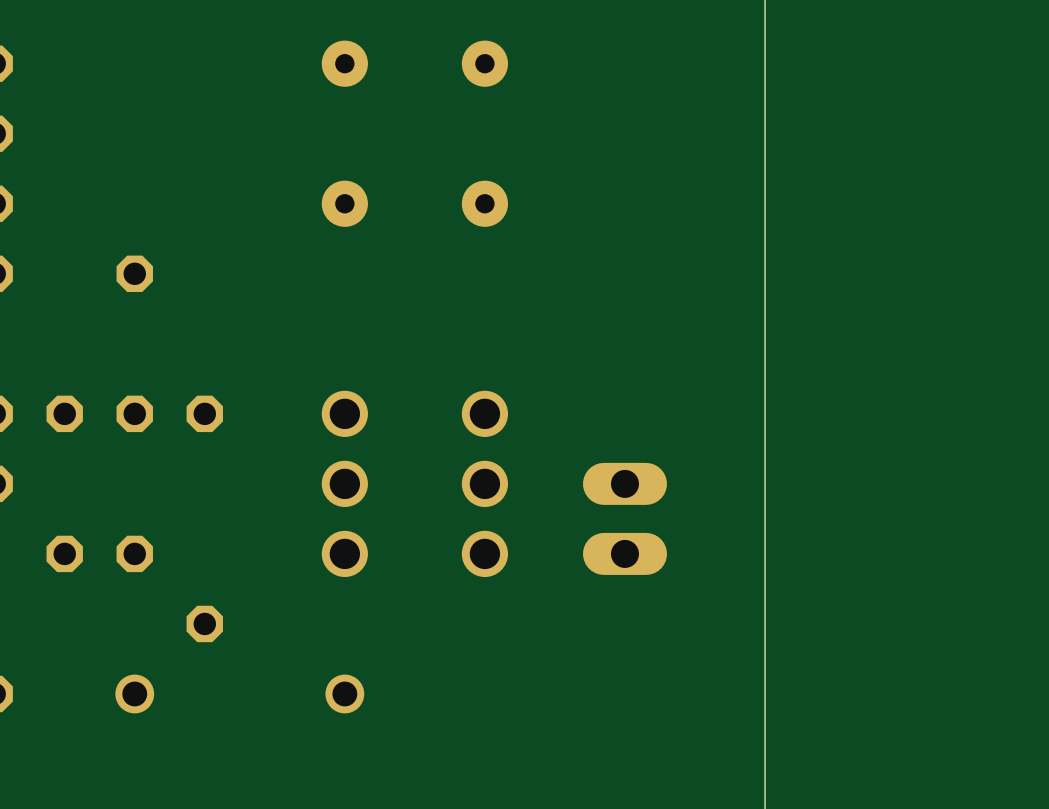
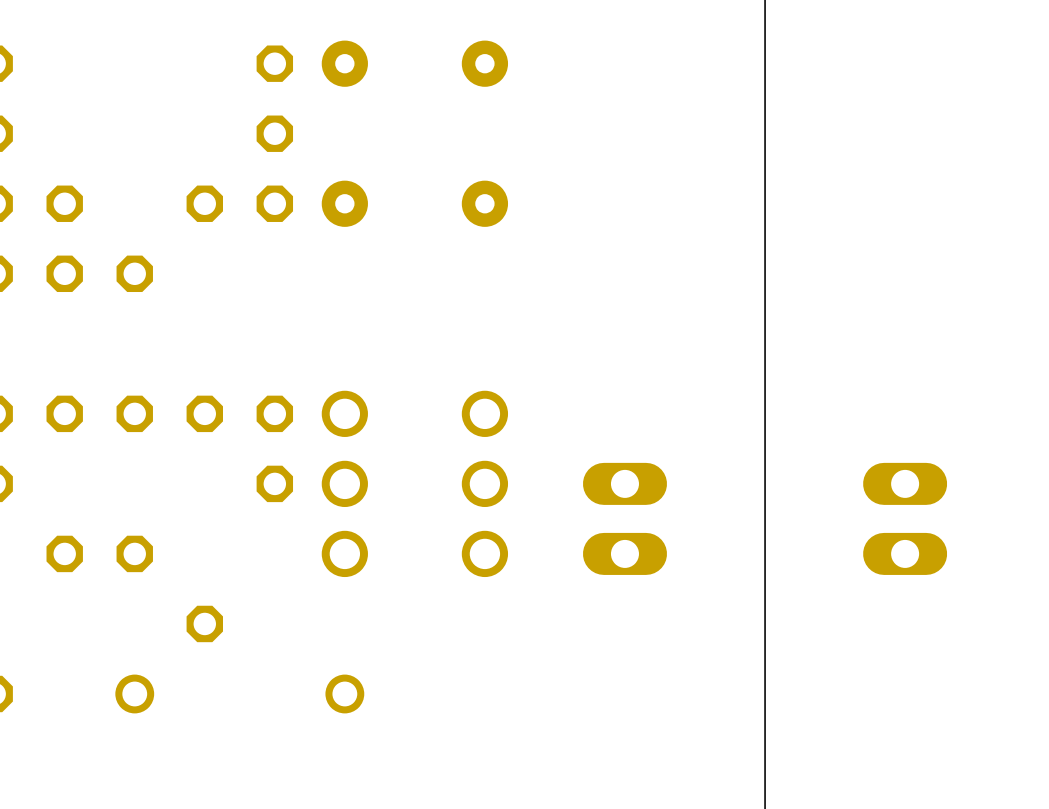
part: none -> (274, 98)
part: none -> (239, 203)
part: none -> (64, 238)
part: none -> (274, 448)
part: none -> (905, 518)

